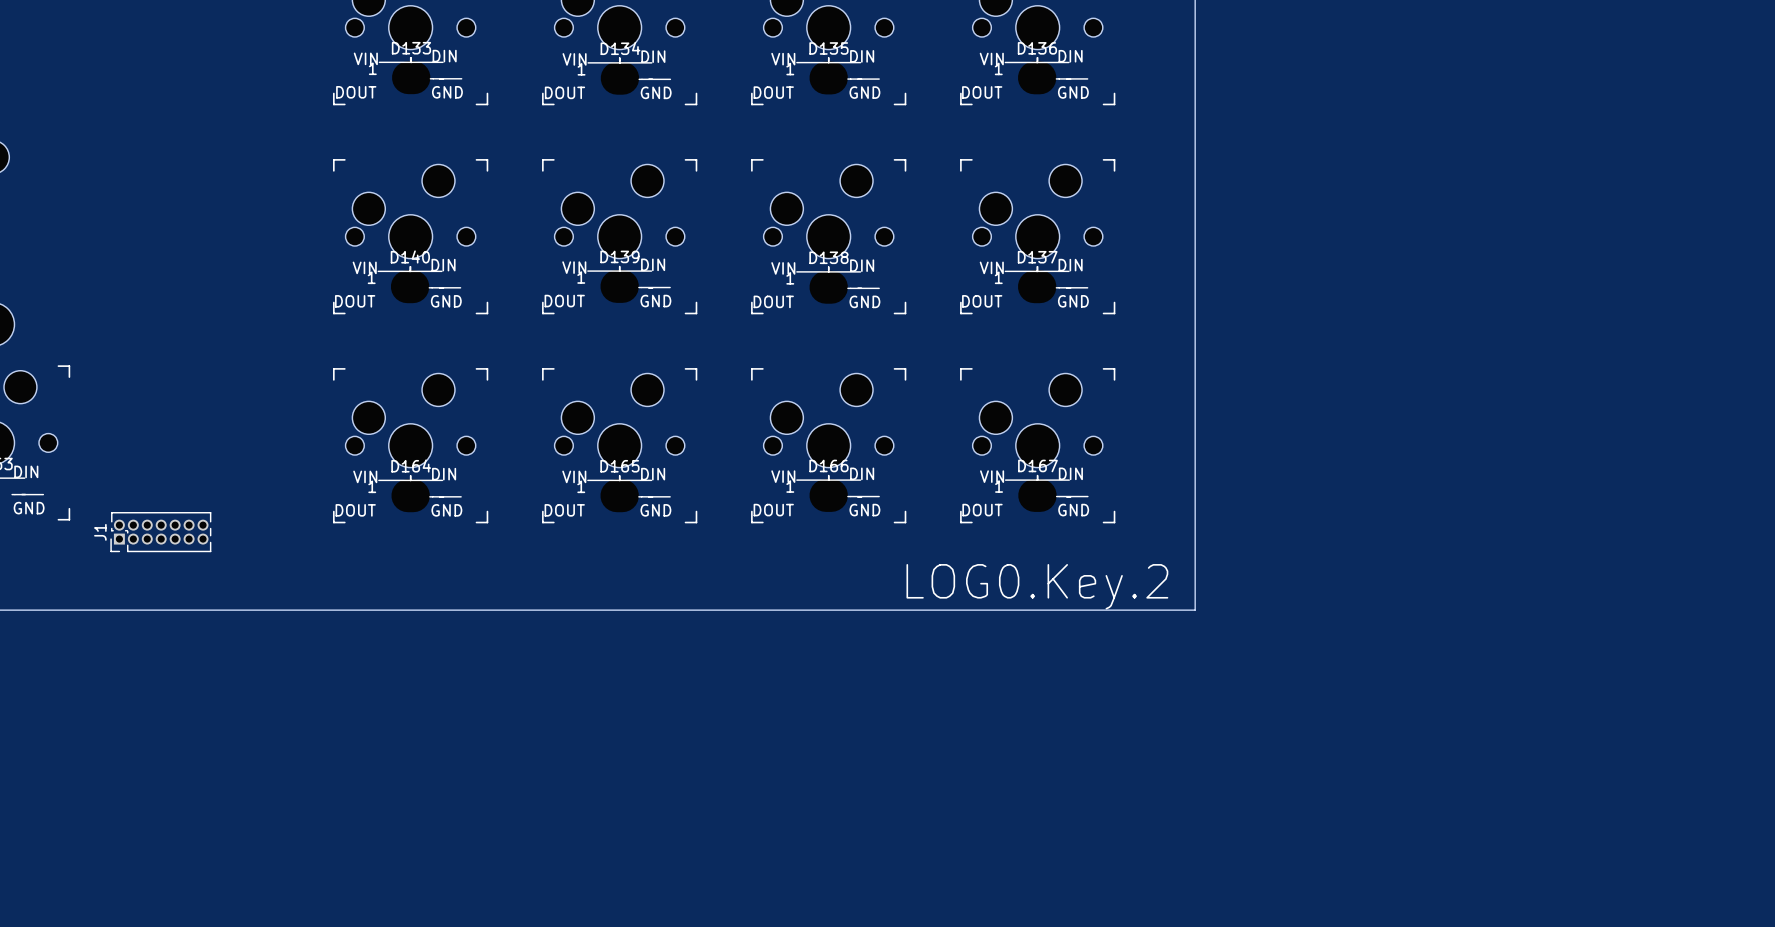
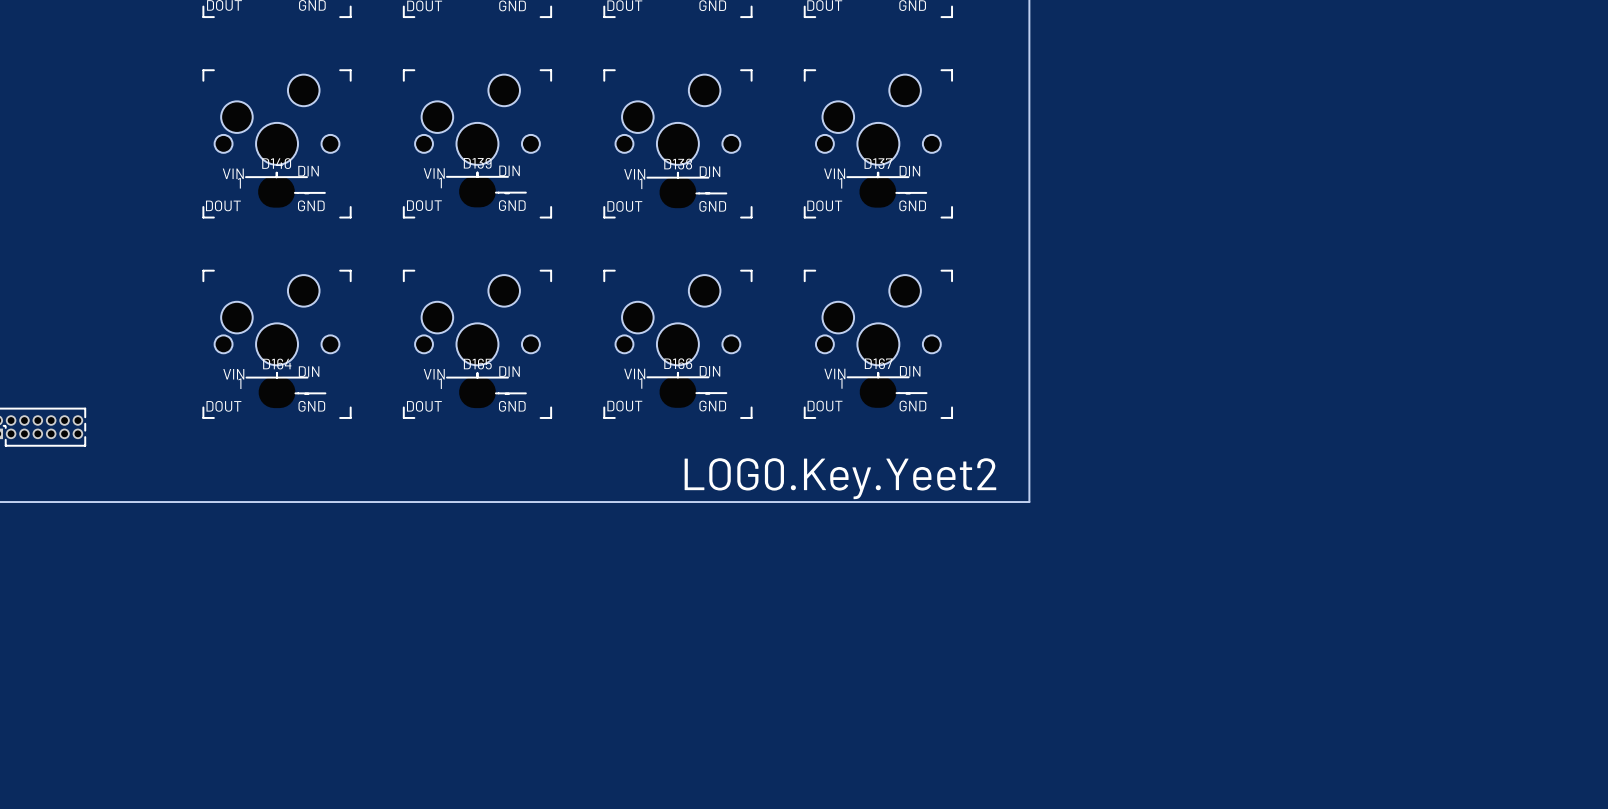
text: LOG0.Key.2 (1037, 586) -> LOG0.Key.Yeet2 (840, 478)

